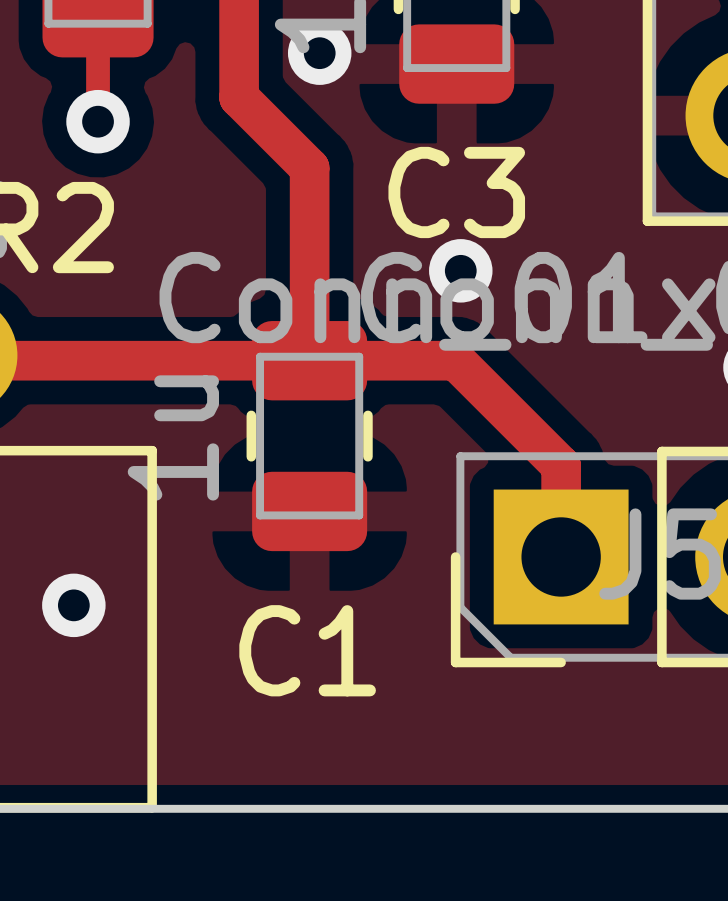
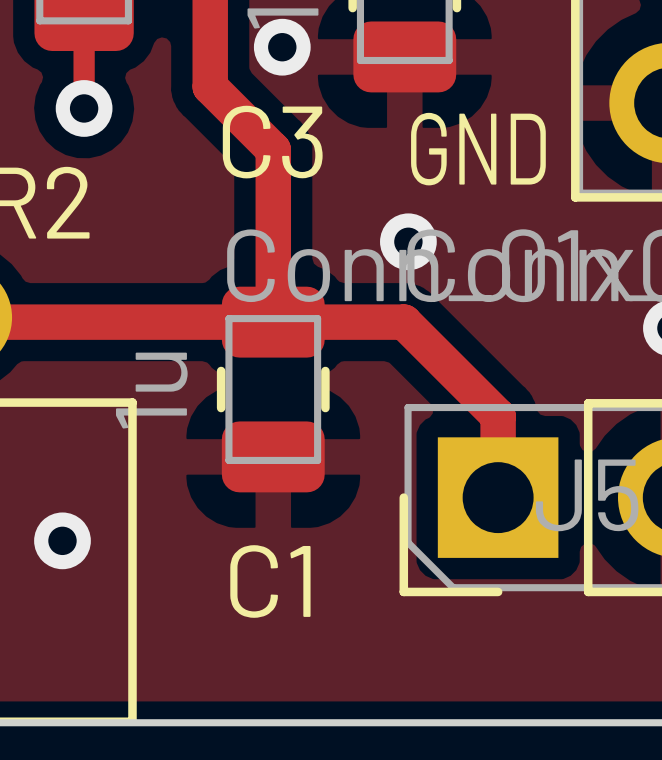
text: none -> GND (478, 149)
C3 name position: C3 (456, 192) -> C3 (272, 142)

